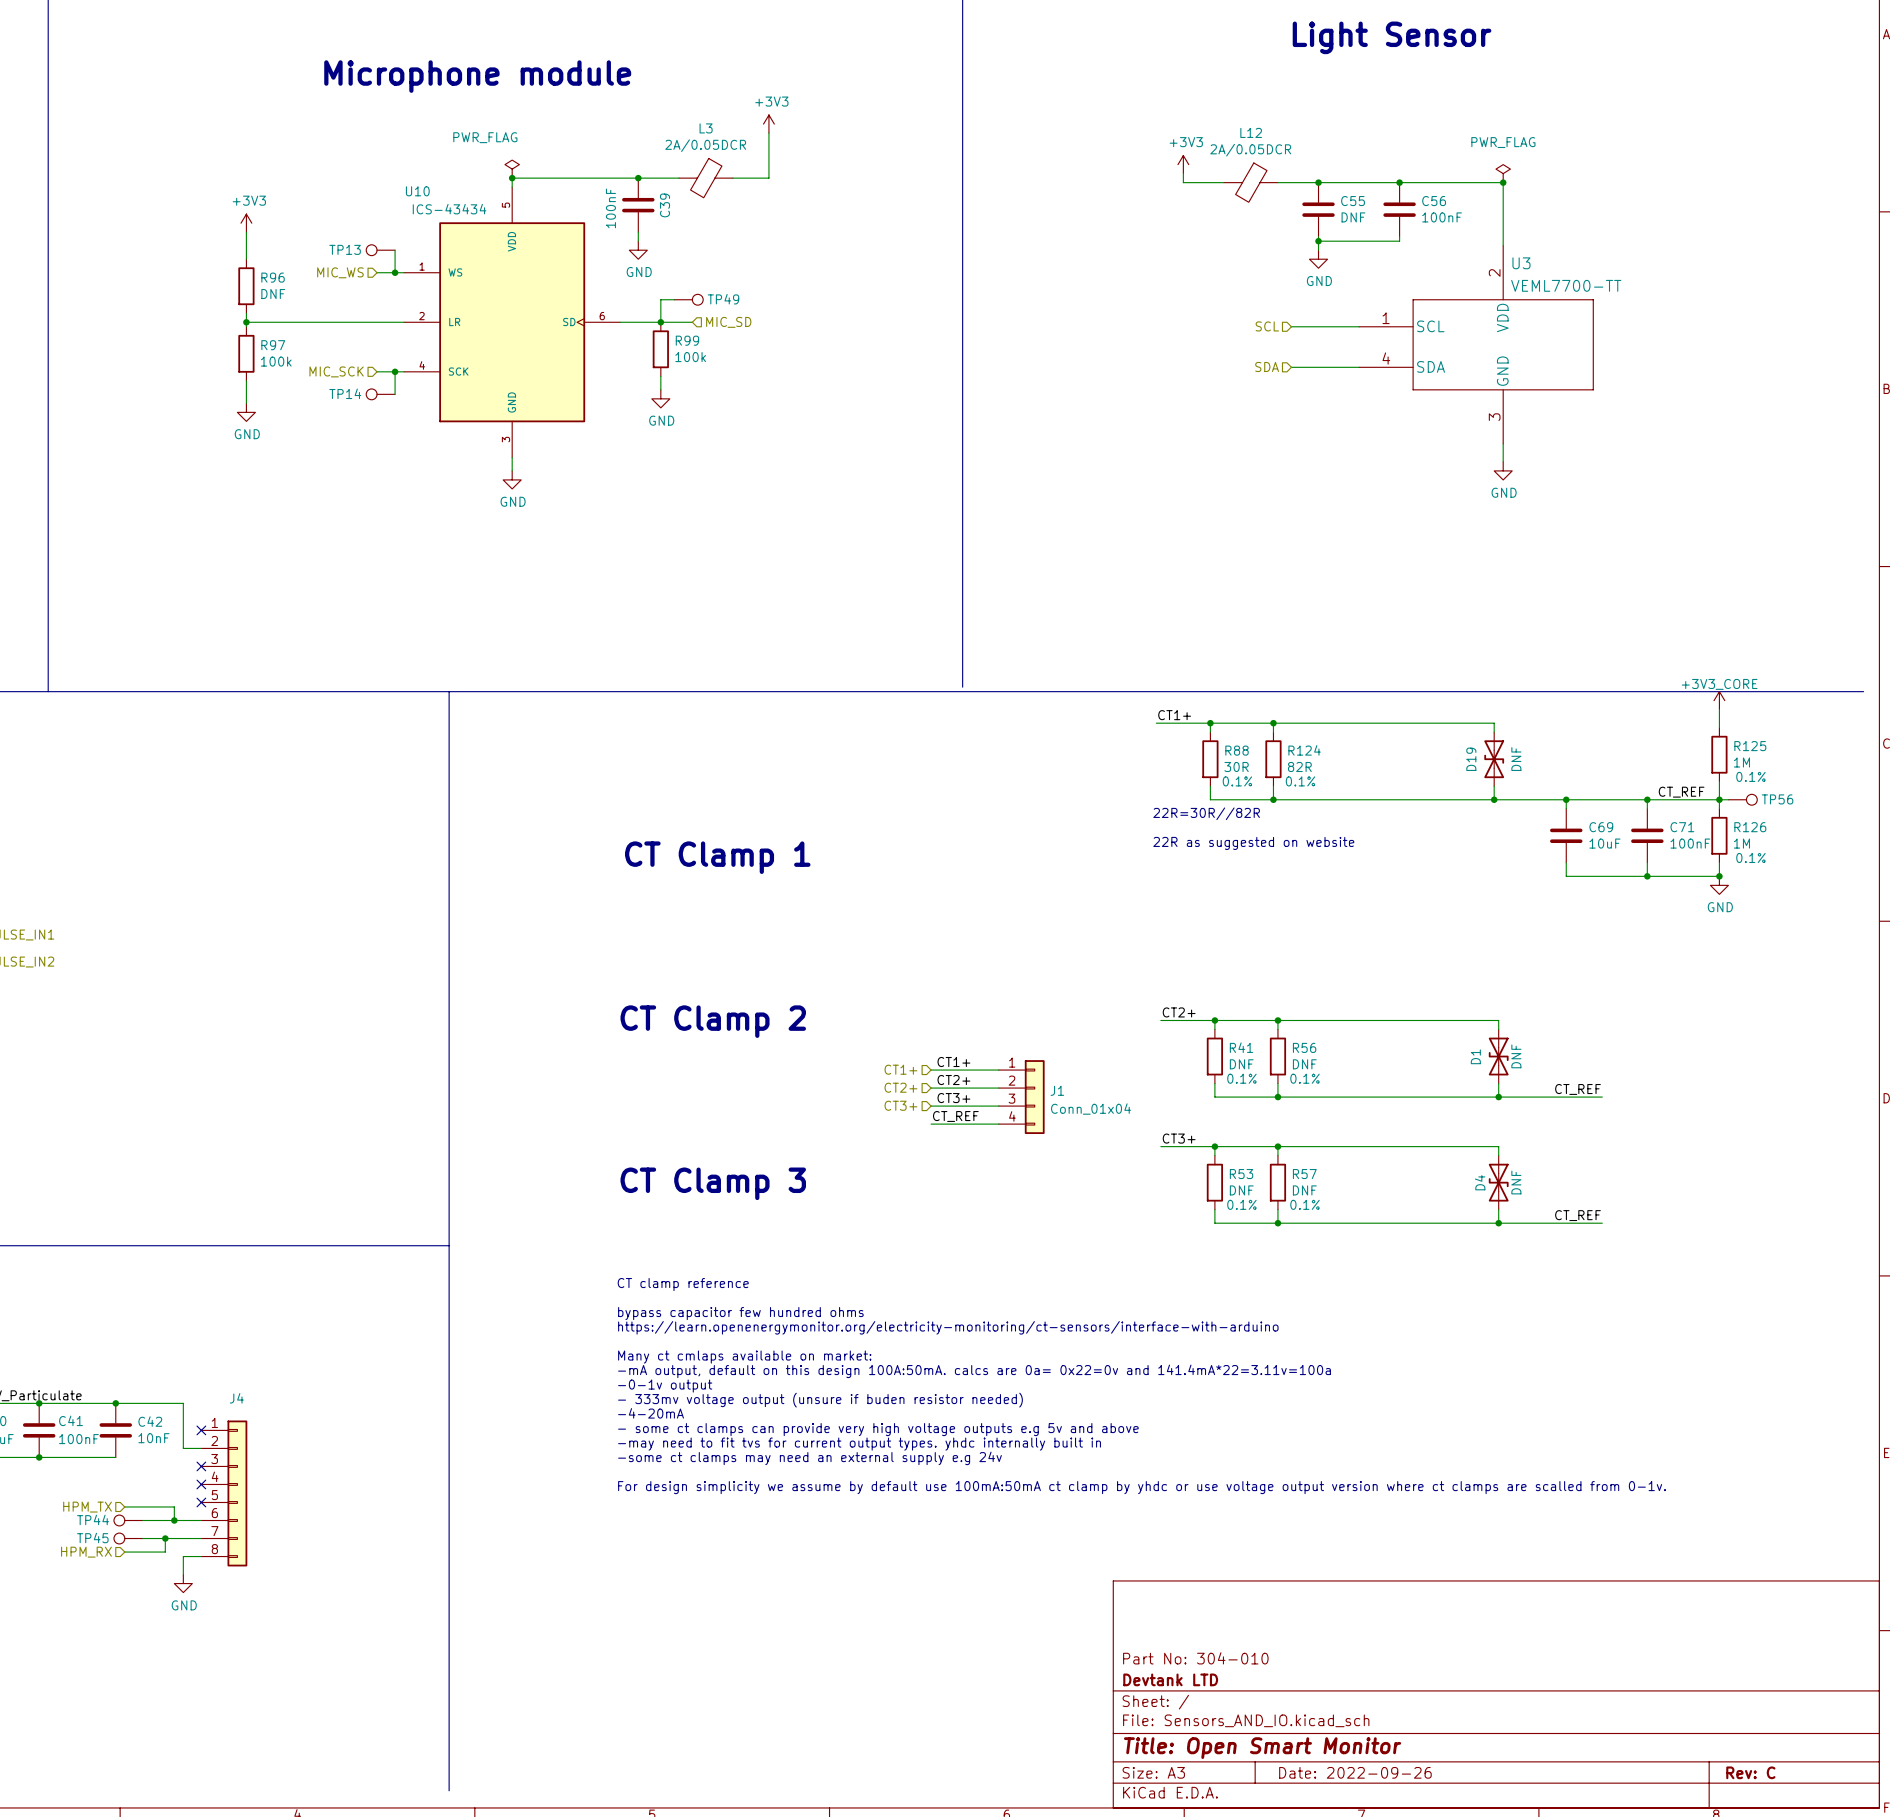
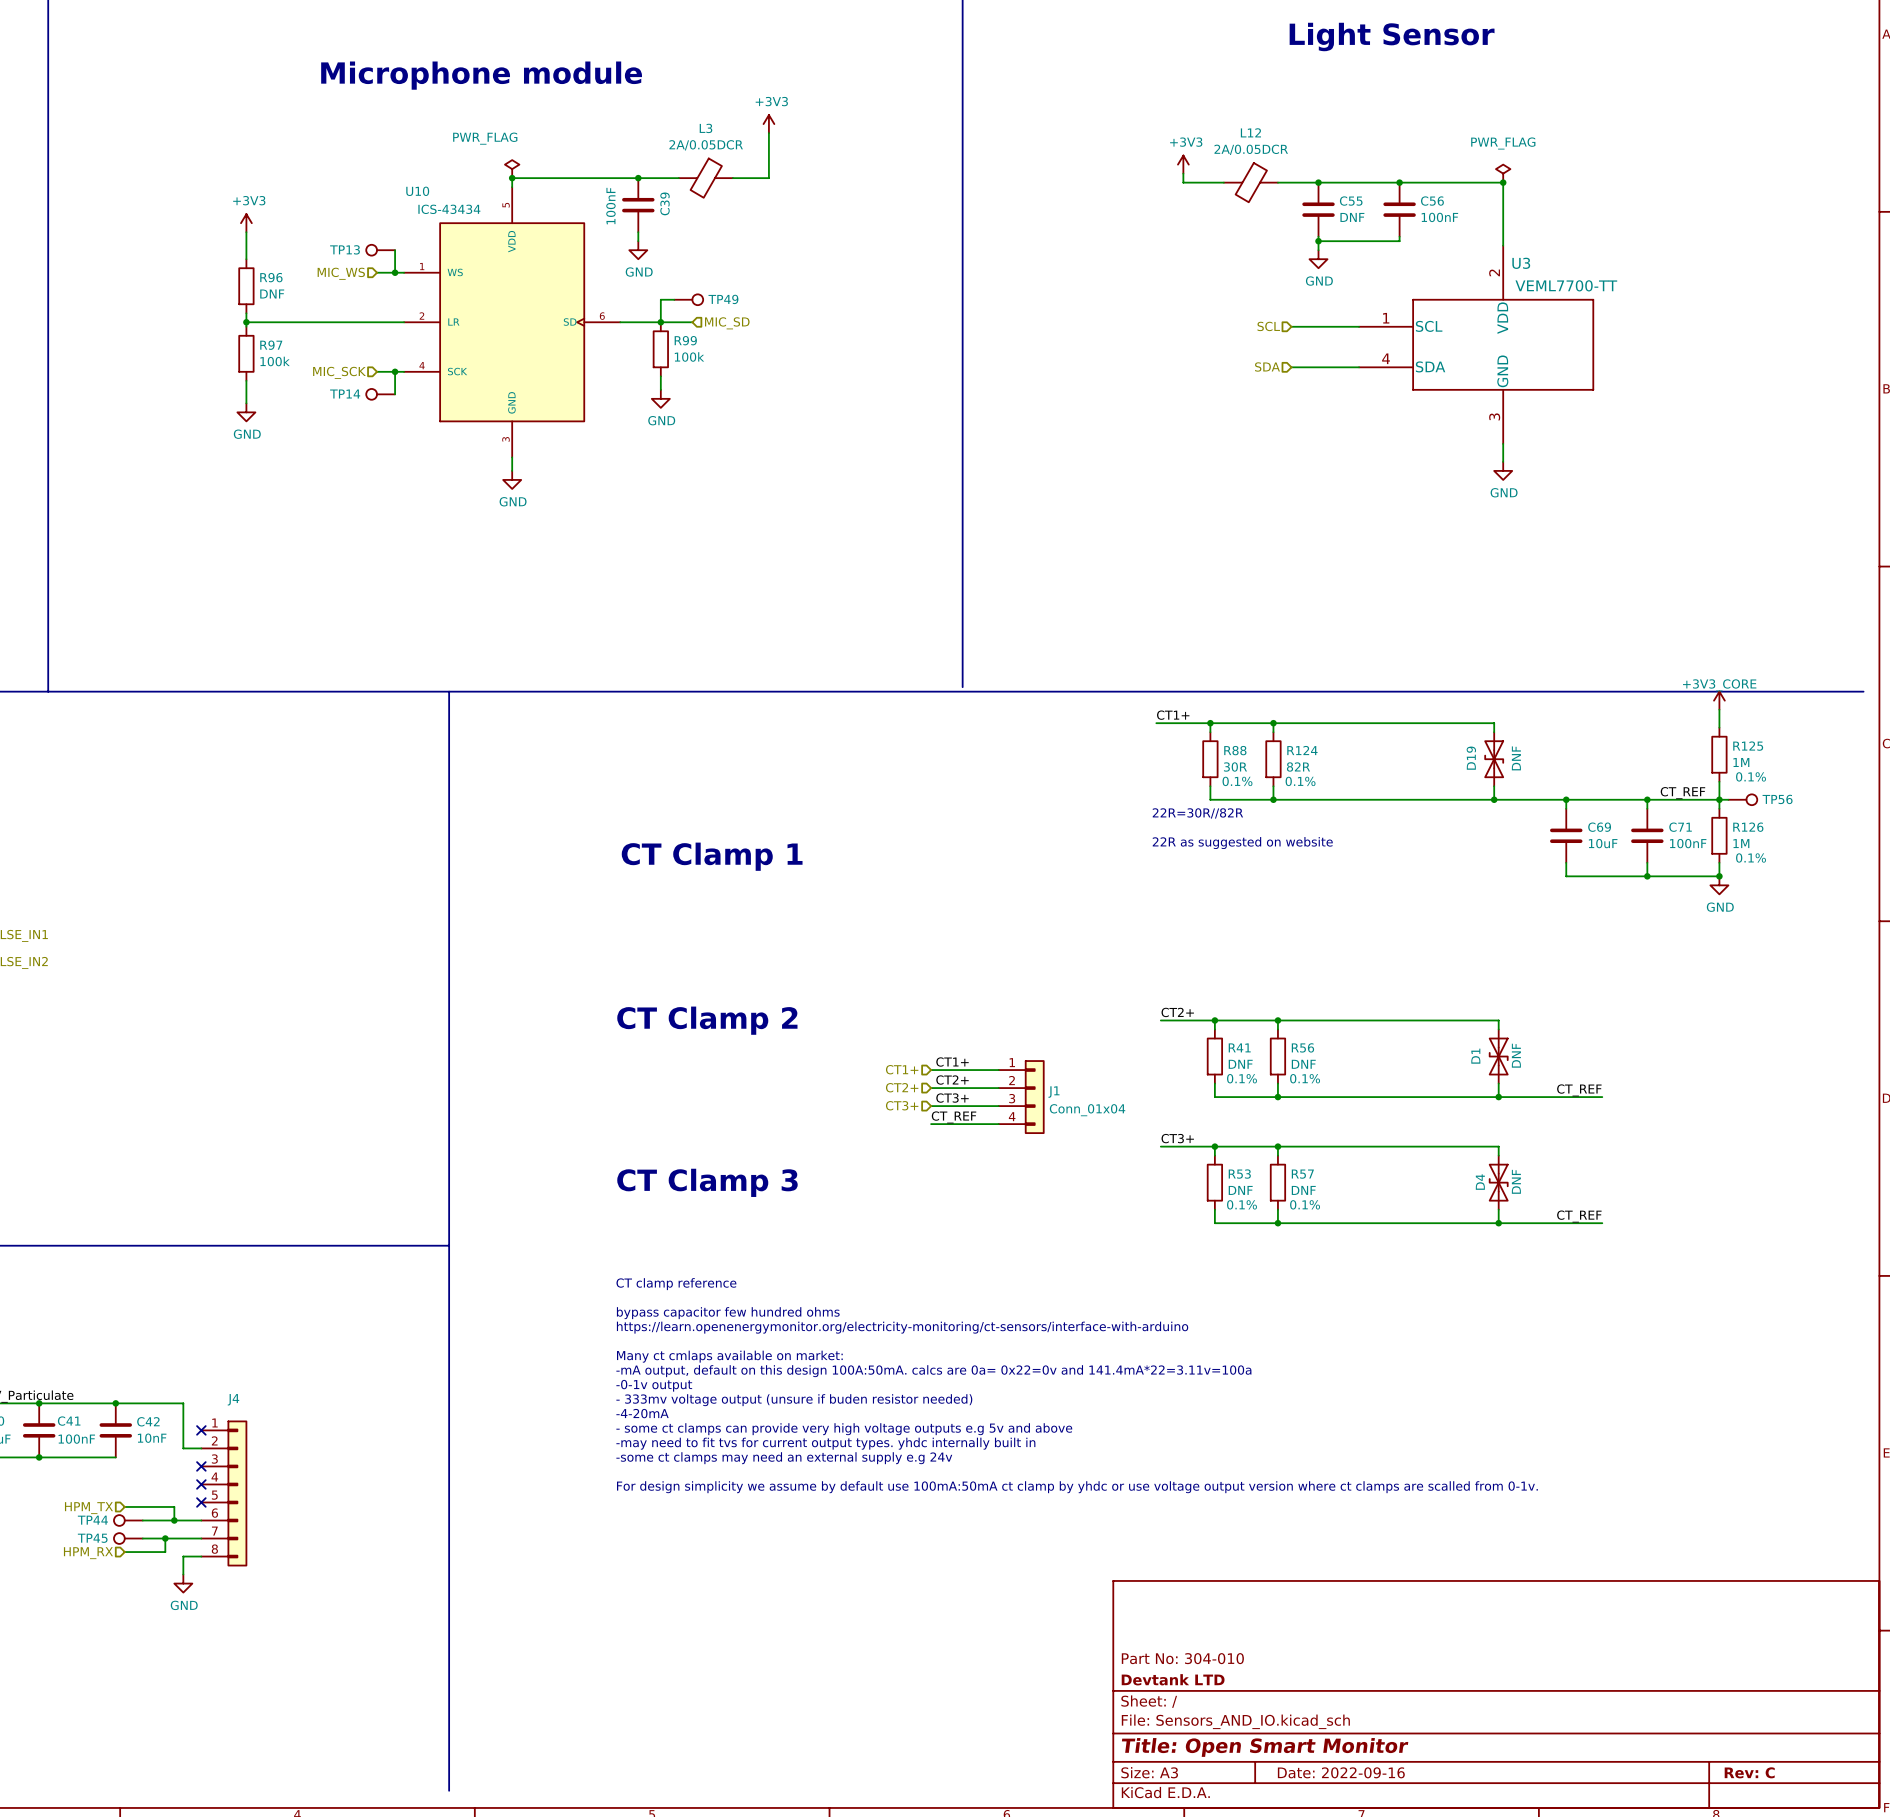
title block: Date: 2022-09-26 (1355, 1772) -> Date: 2022-09-16 (1341, 1772)

